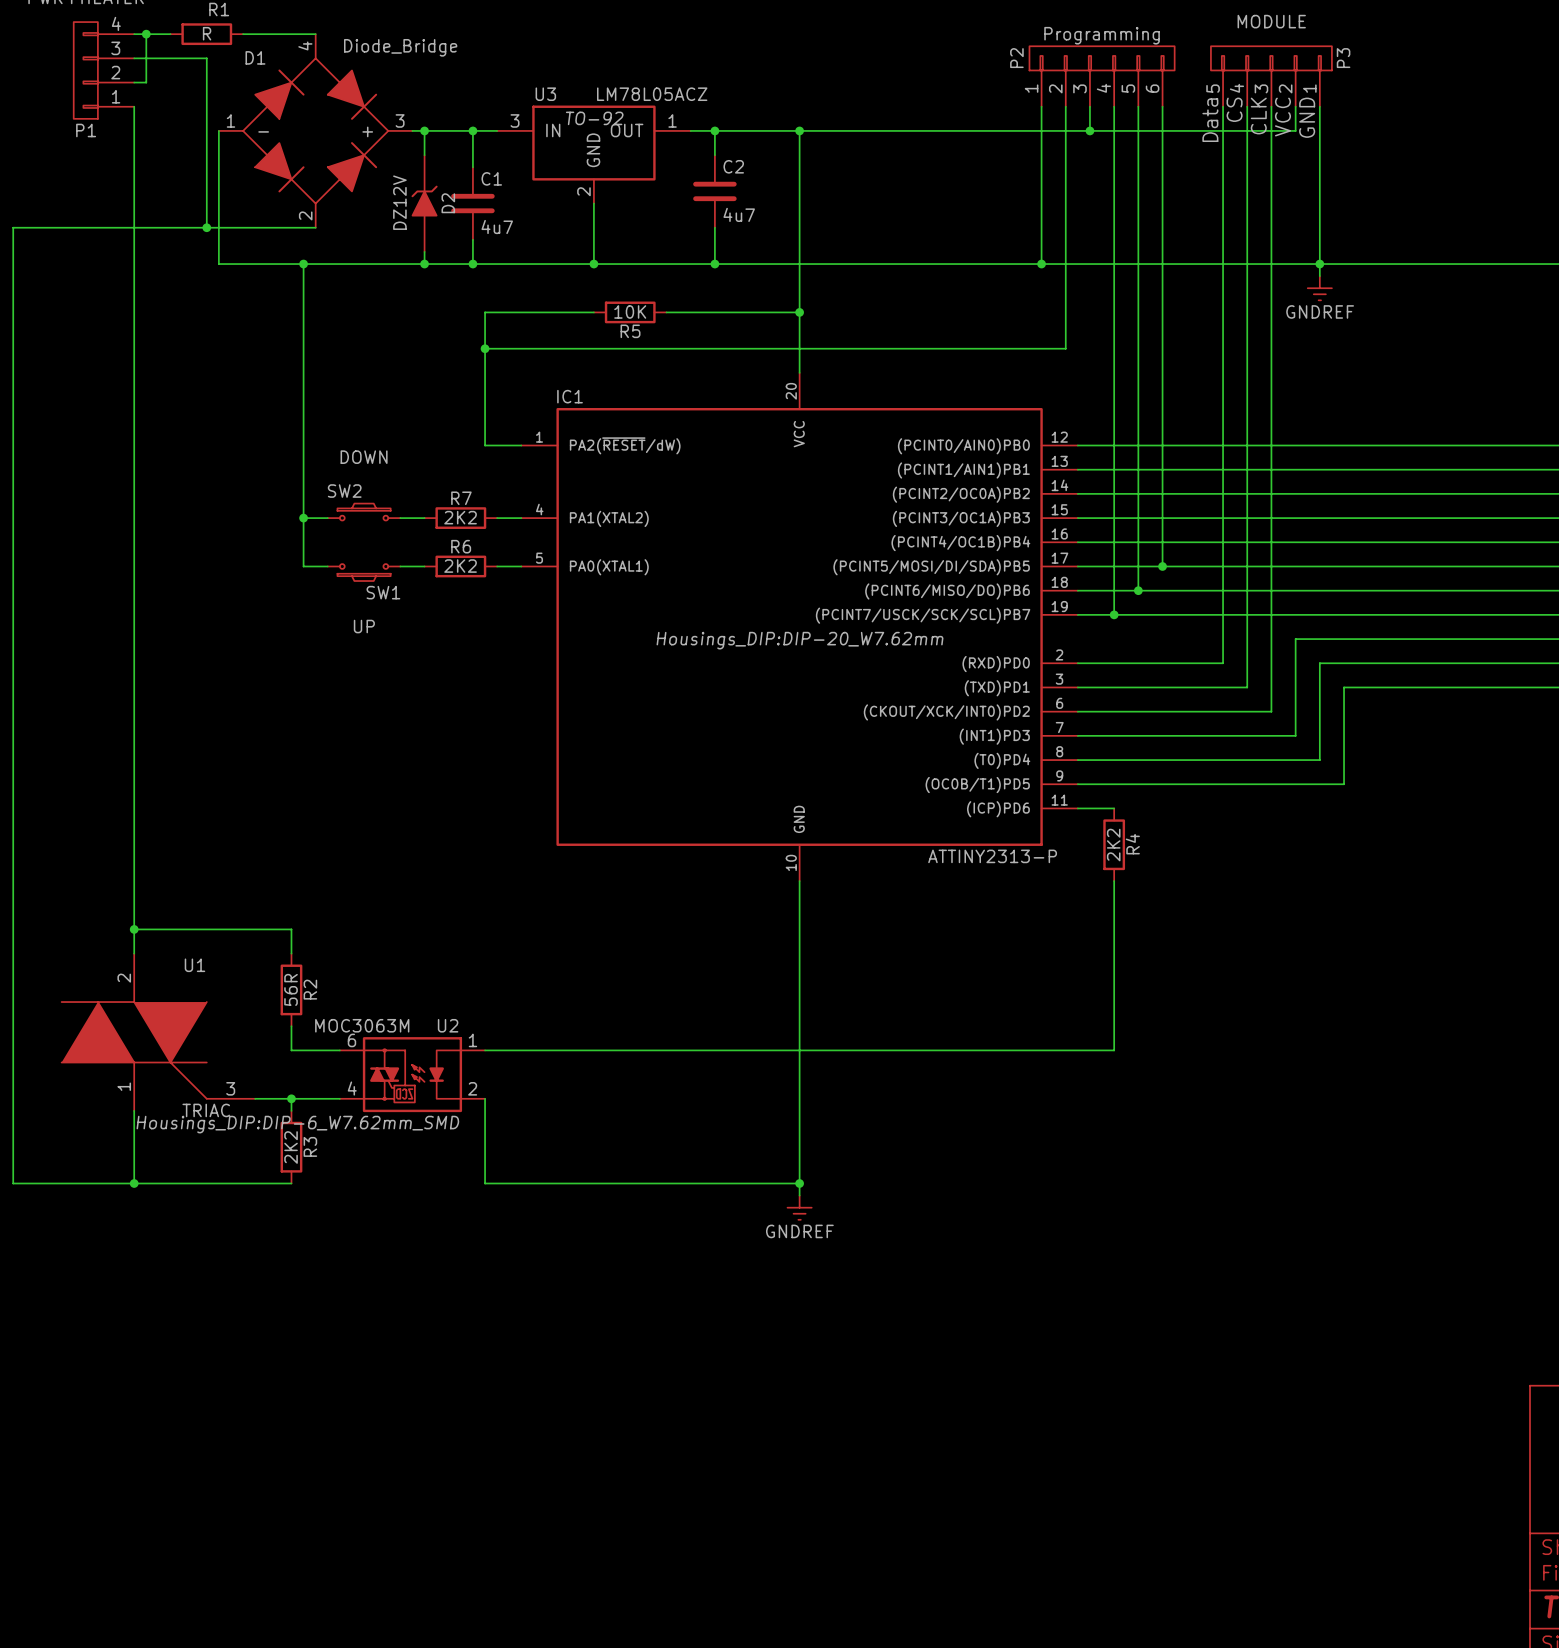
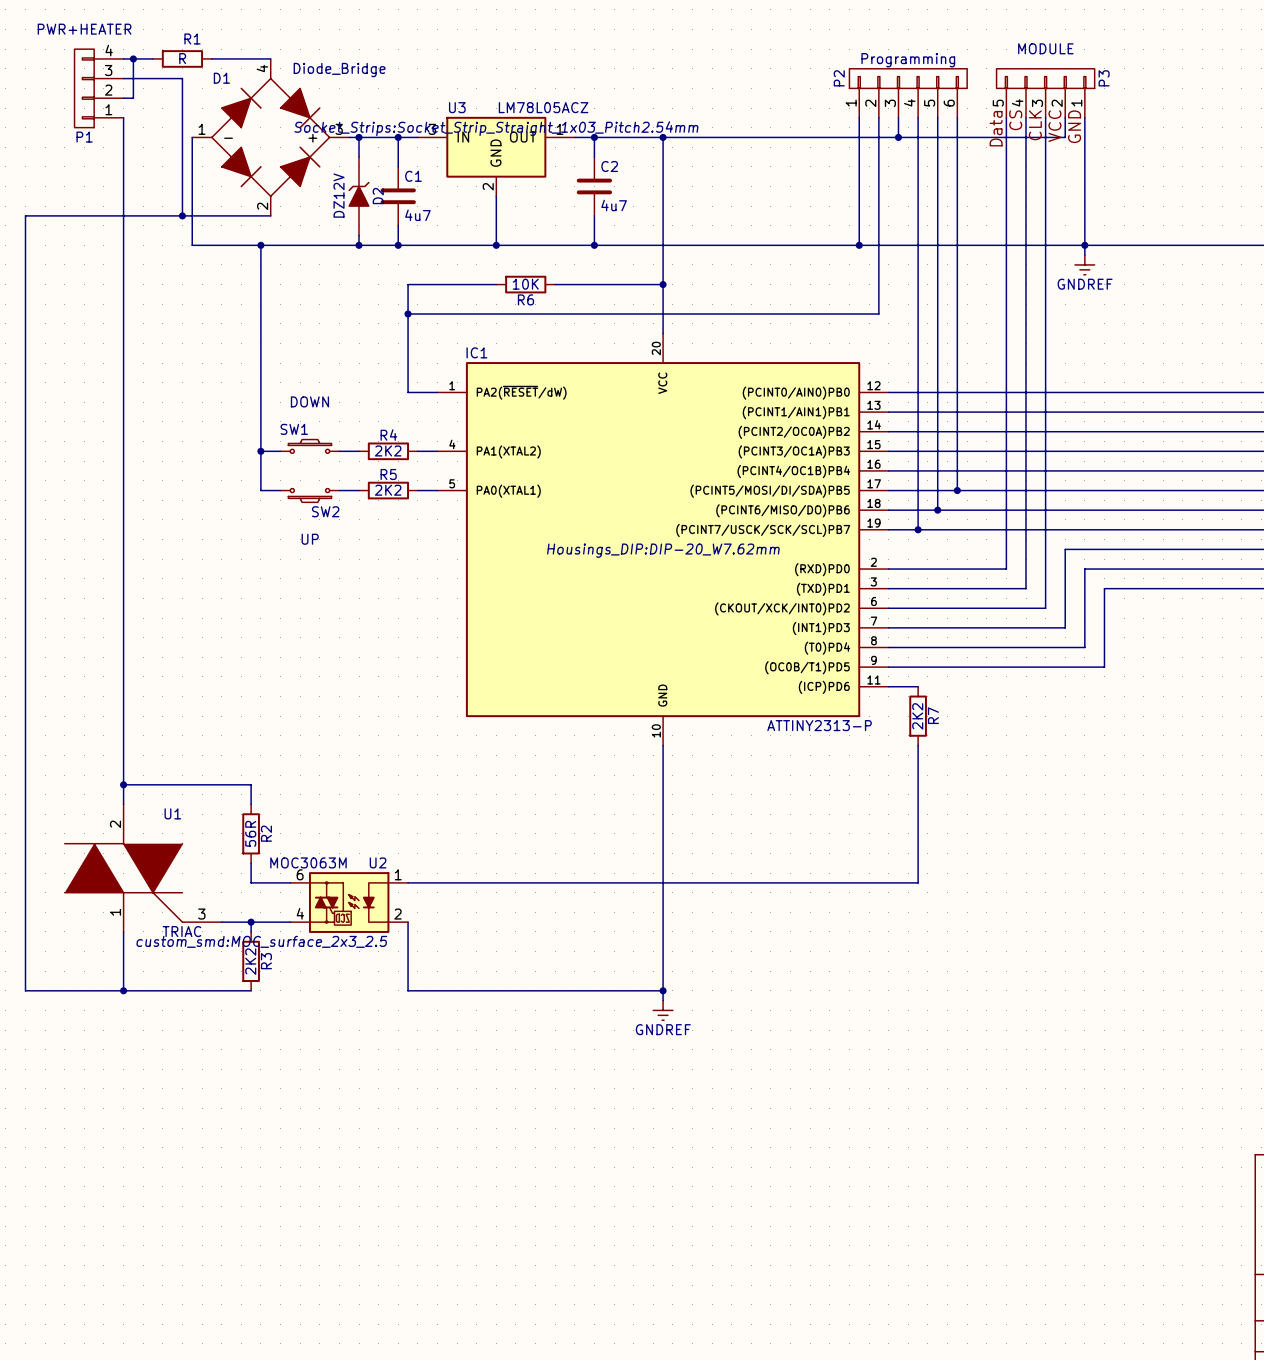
U3 text: TO-92 (594, 118) -> Socket_Strips:Socket_Strip_Straight_1x03_Pitch2.54mm (496, 128)
R5 name: R5 (630, 331) -> R6 (525, 299)
SW2 name: SW2 (344, 491) -> SW1 (294, 429)
R7 name: R7 (461, 498) -> R4 (388, 435)
R6 name: R6 (461, 546) -> R5 (388, 474)
SW1 name: SW1 (383, 592) -> SW2 (325, 511)
R4 name: R4 (1132, 844) -> R7 (933, 715)
U2 text: Housings_DIP:DIP-6_W7.62mm_SMD (297, 1124) -> custom_smd:MOC_surface_2x3_2.5 (261, 941)

